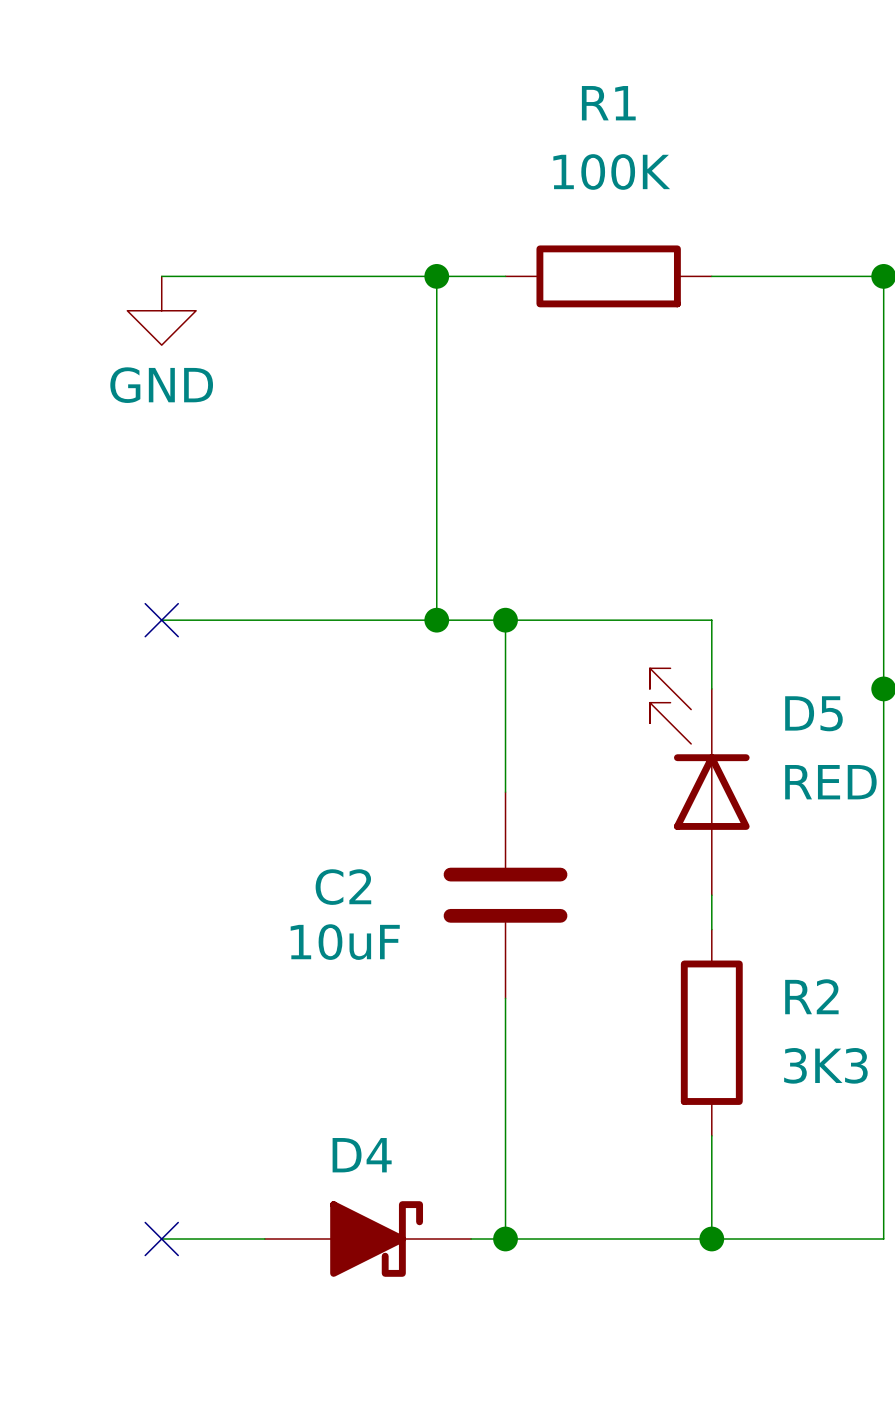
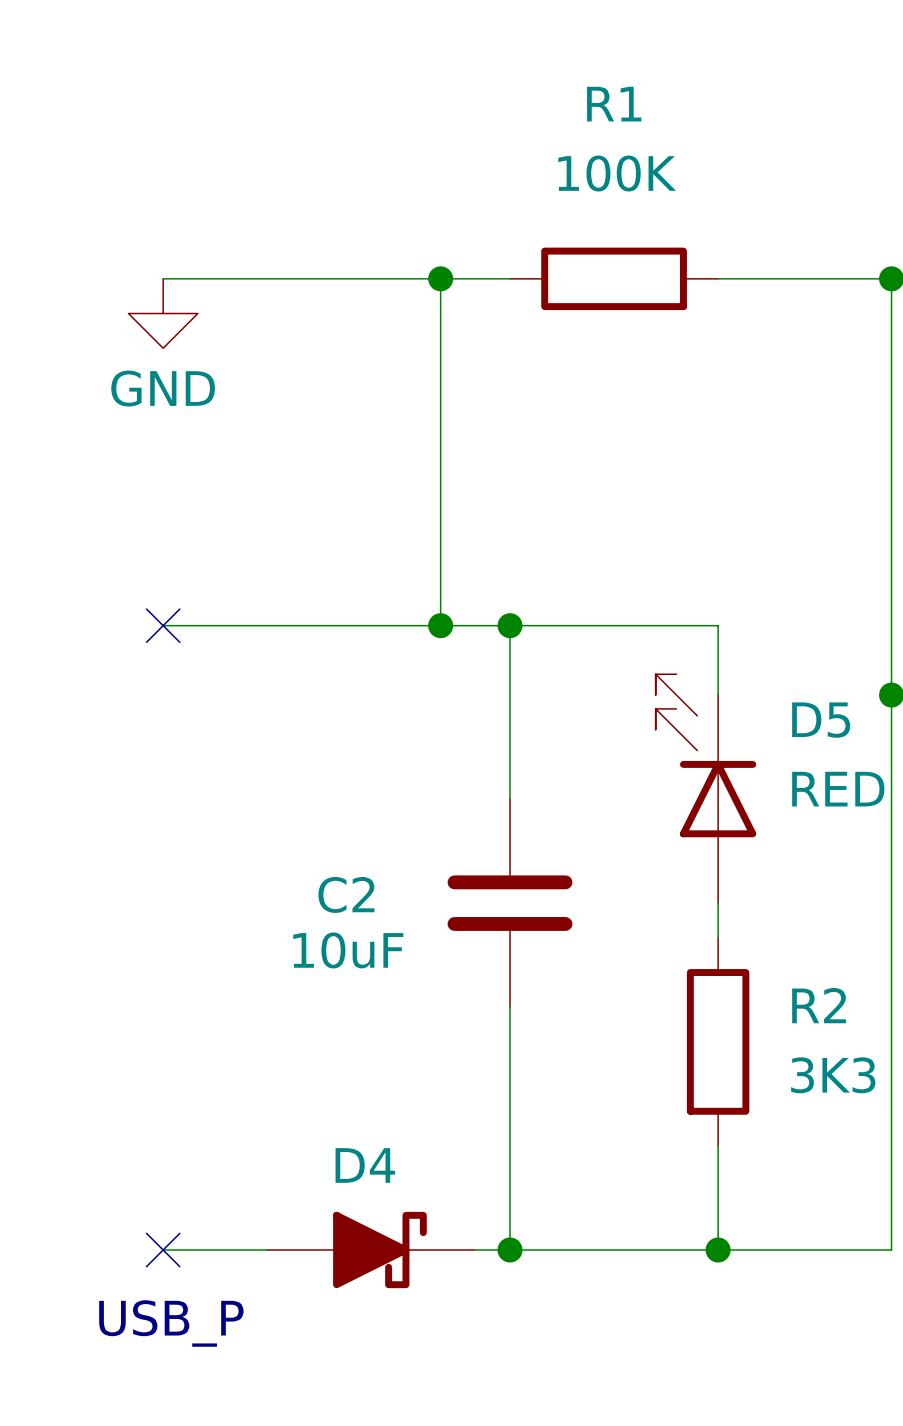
text: none -> USB_P (171, 1323)

